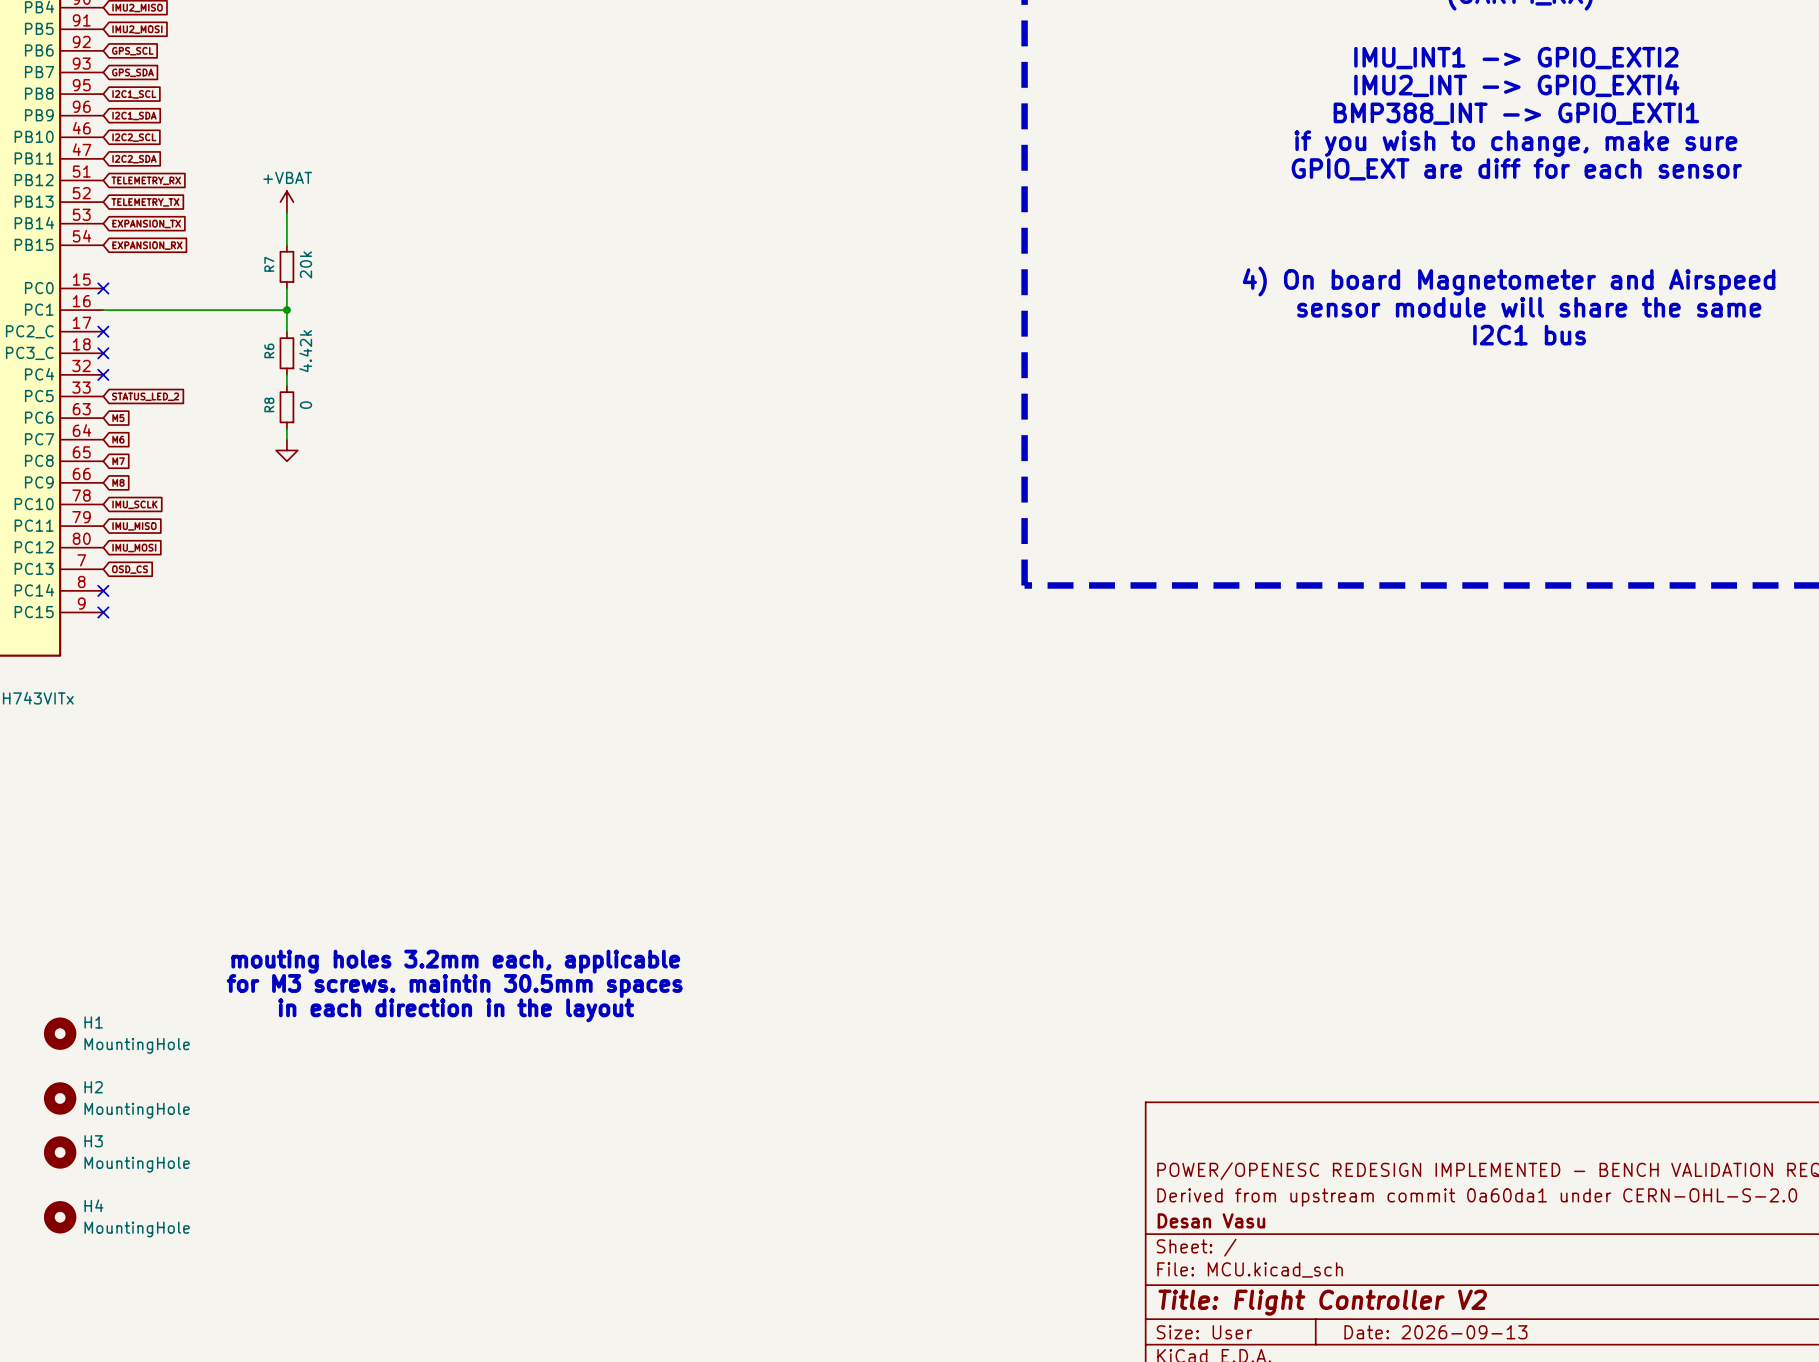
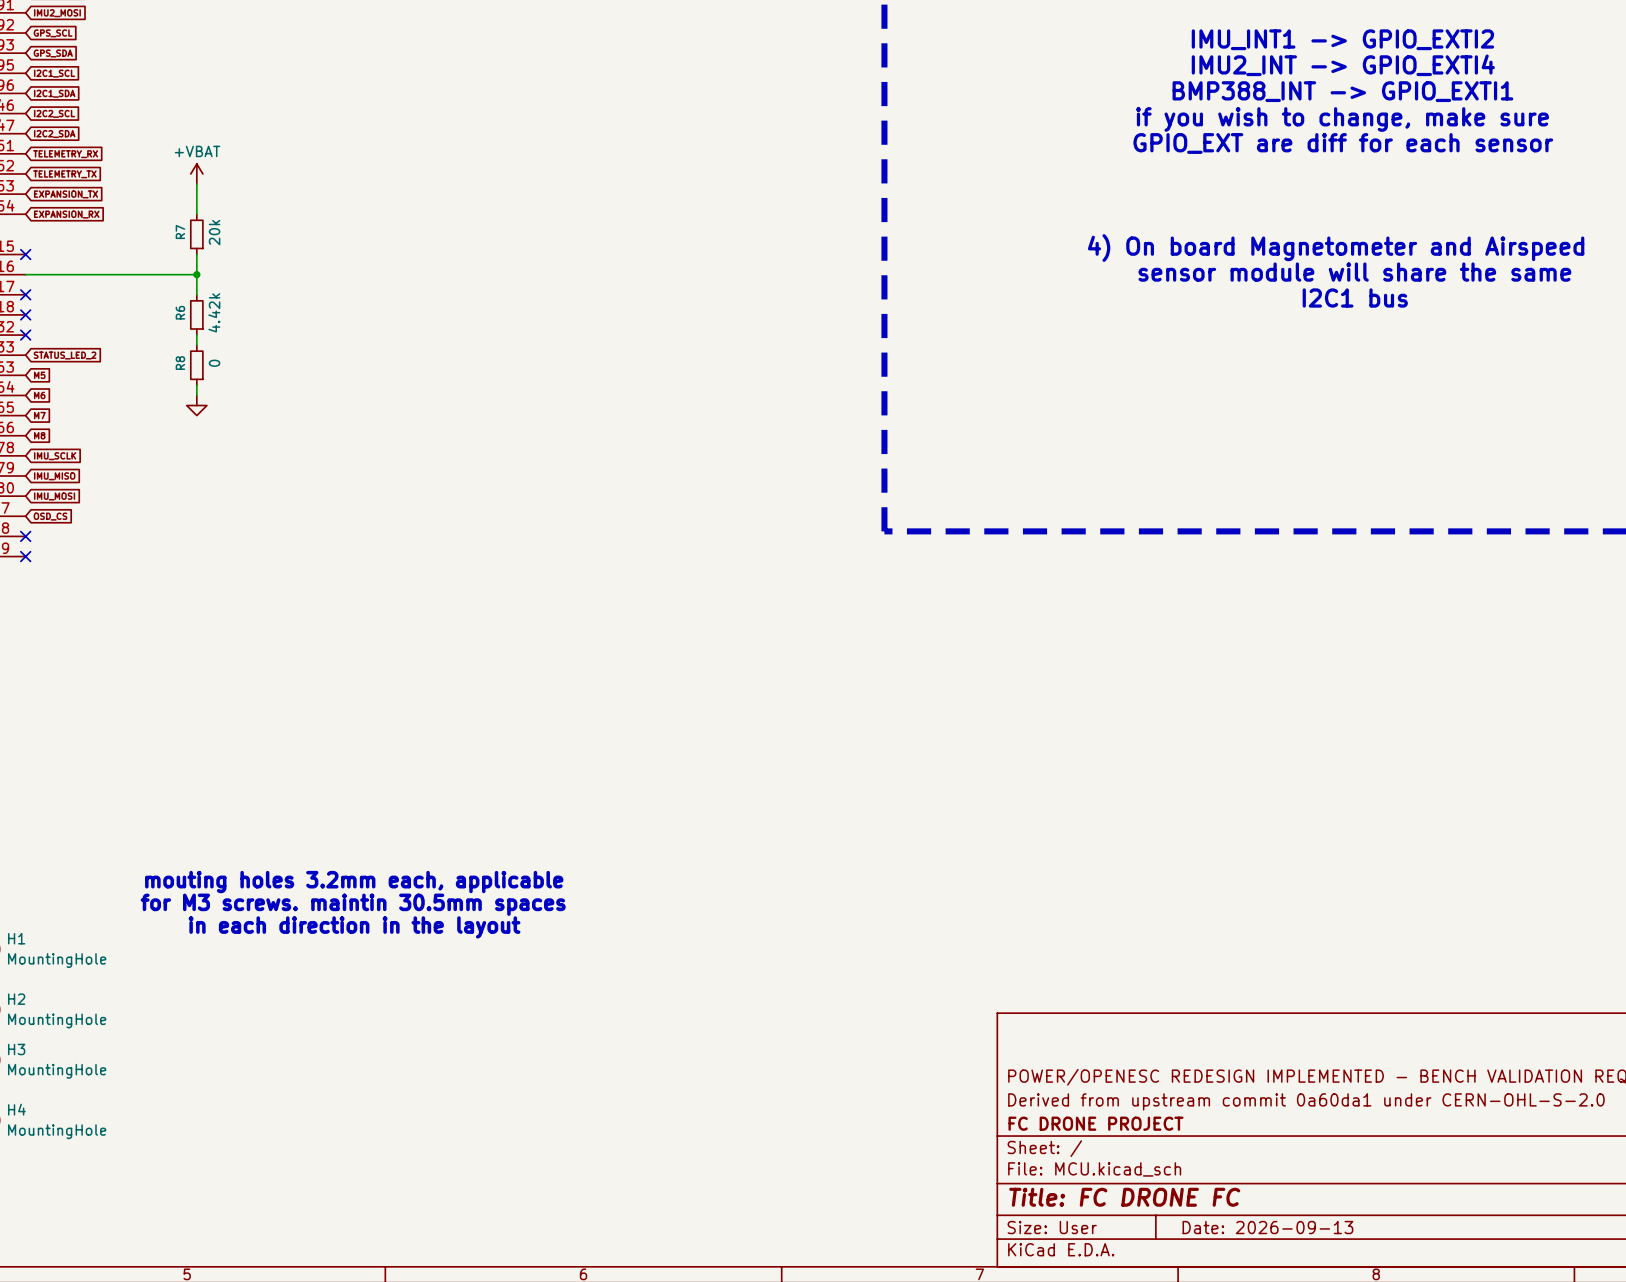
title block: Desan Vasu (1211, 1220) -> FC DRONE PROJECT (1096, 1123)
title block: Title: Flight Controller V2 (1322, 1302) -> Title: FC DRONE FC (1124, 1197)

